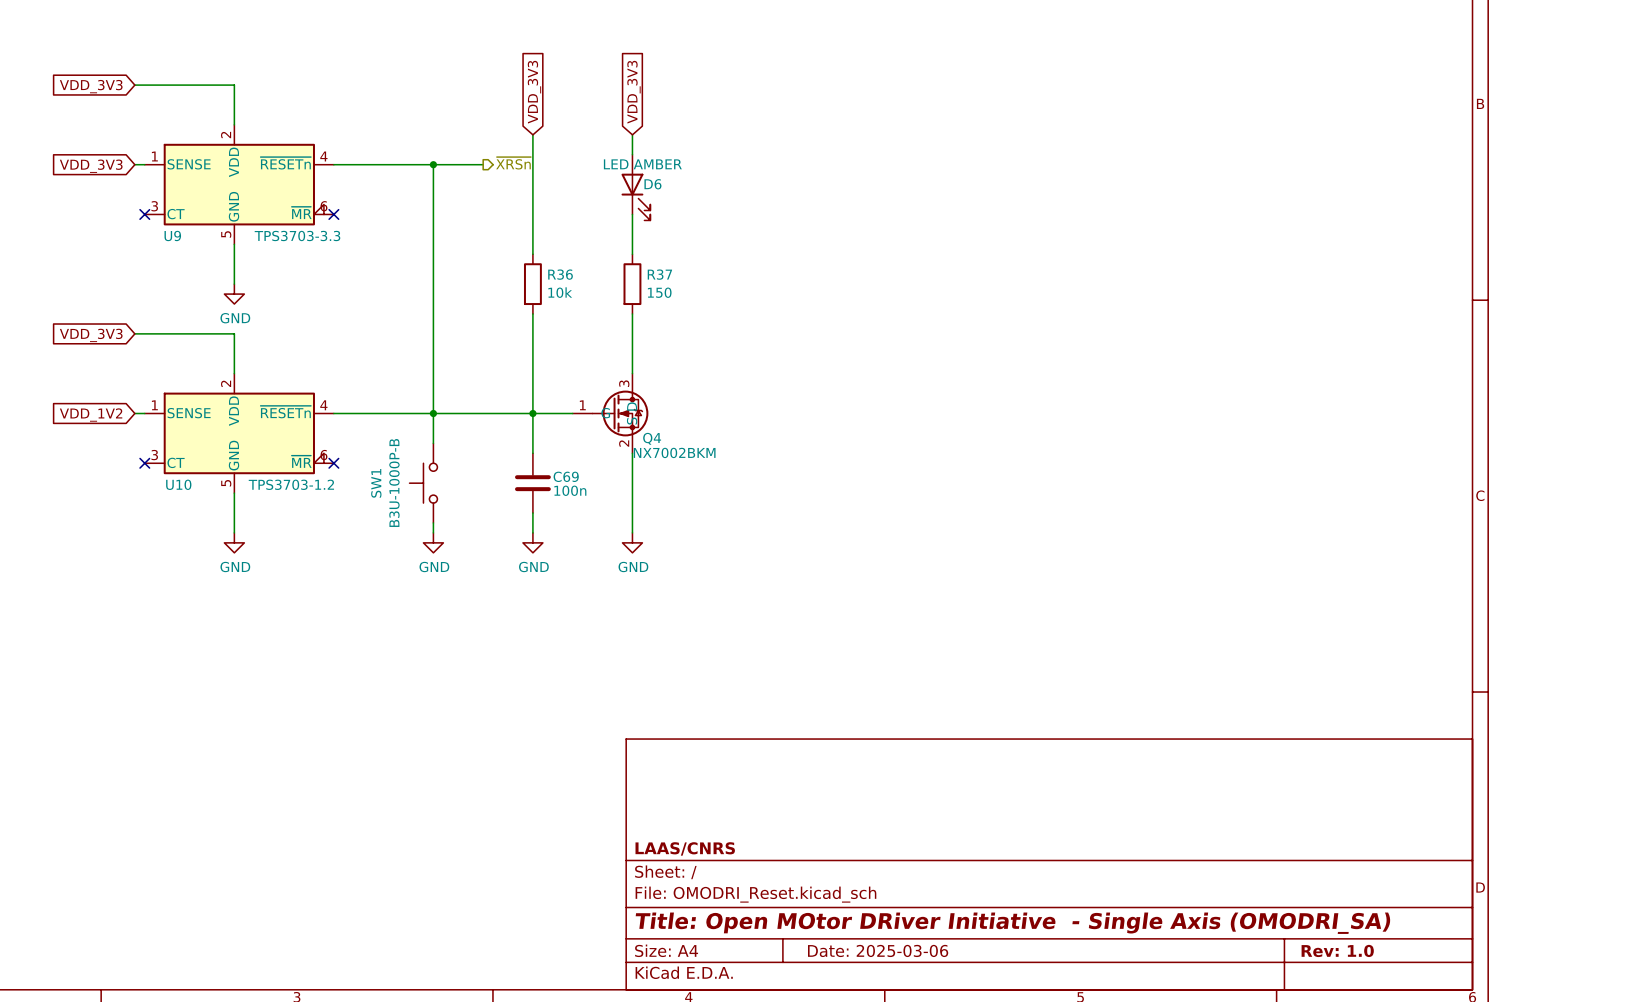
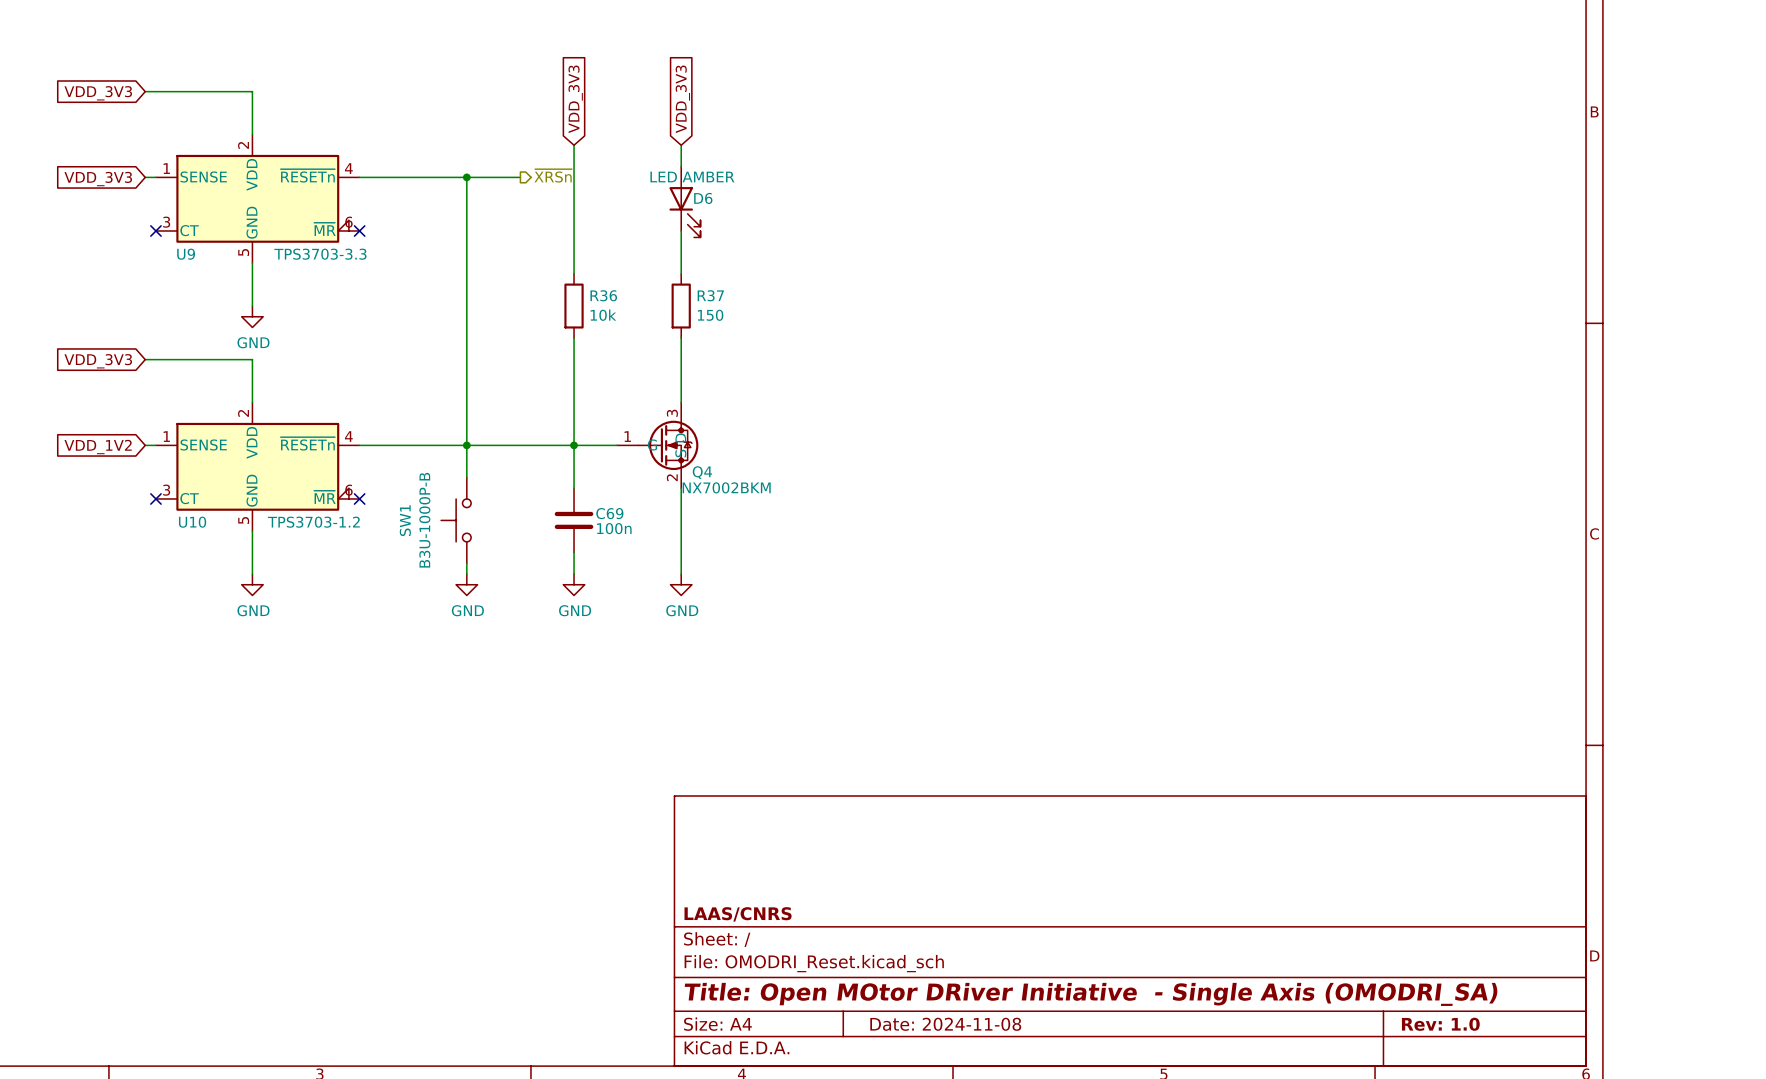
title block: Date: 2025-03-06 (878, 950) -> Date: 2024-11-08 (945, 1024)

